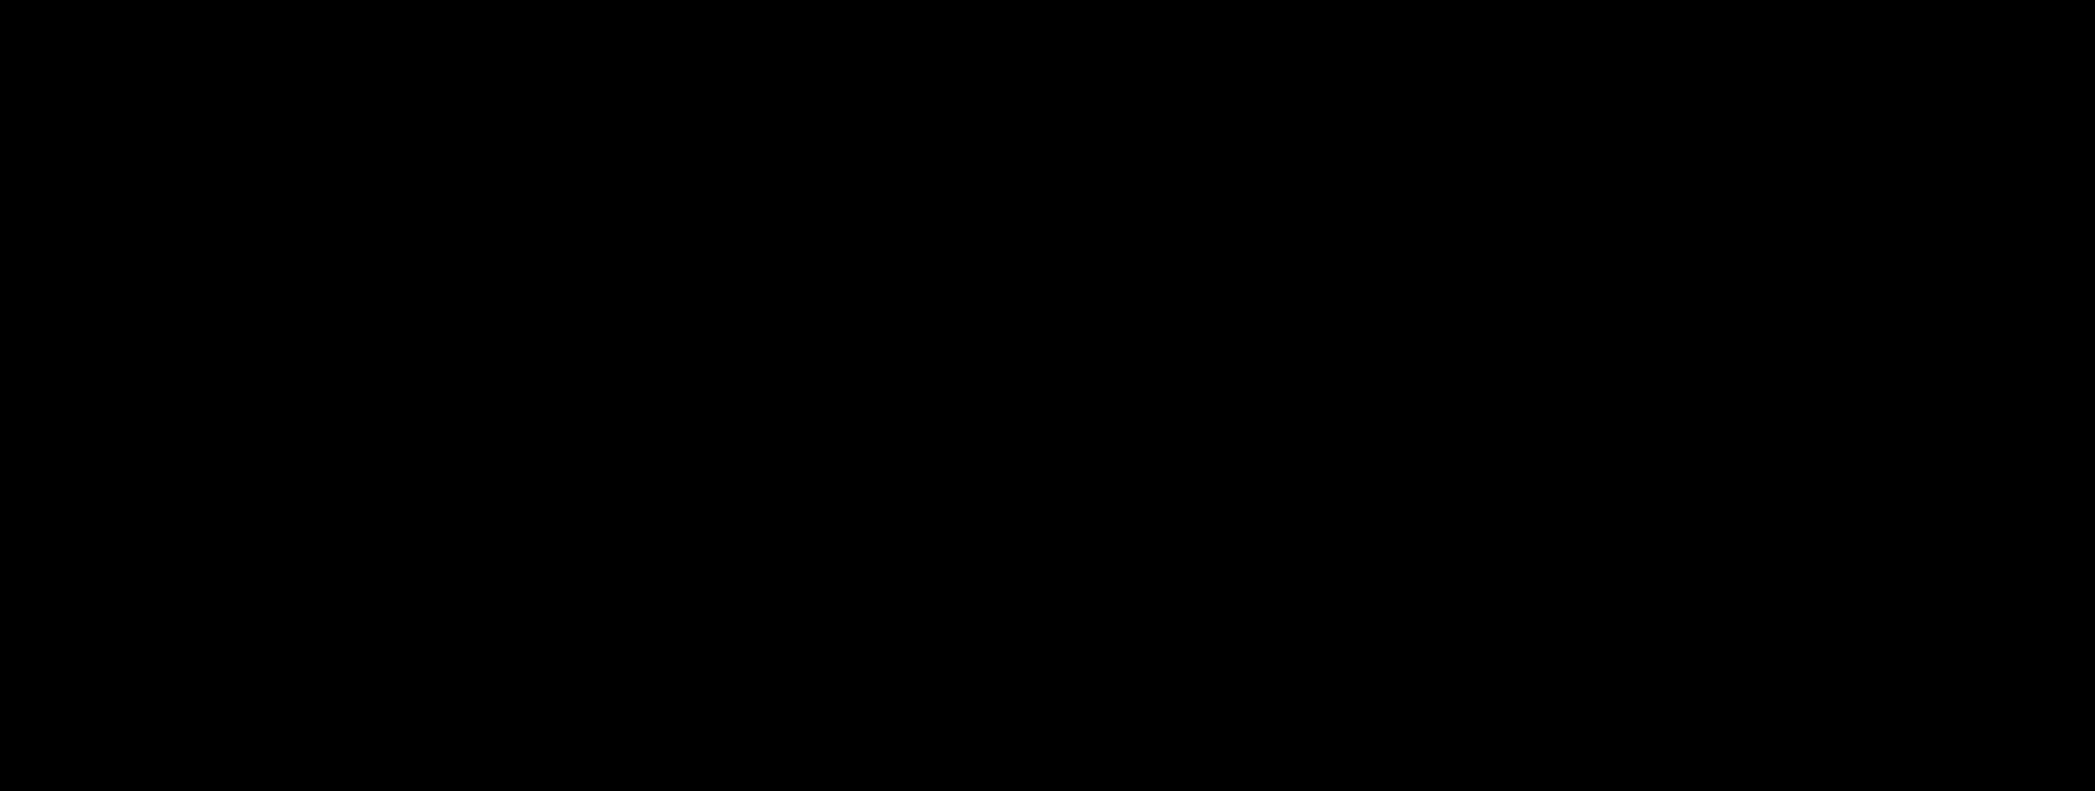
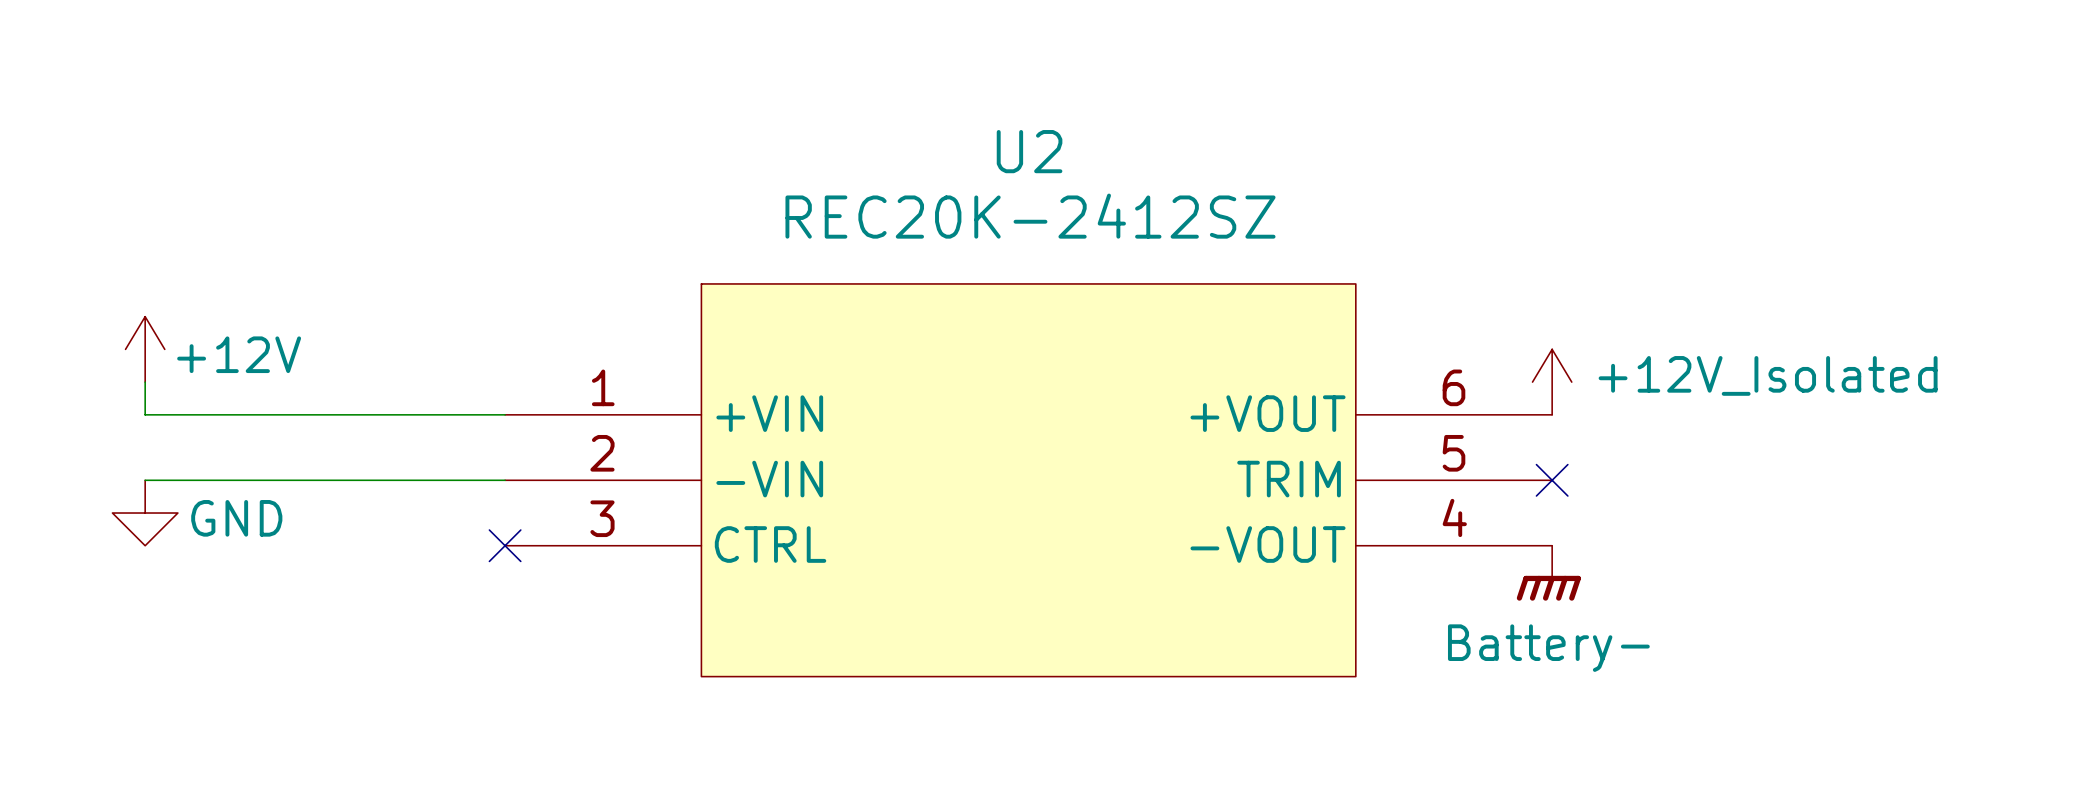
power symbol: none -> +12V (145, 349)
wire: none -> (145, 382) (145, 414) (505, 414)
power symbol: none -> +12V_Isolated (1552, 382)
wire: none -> (145, 480) (505, 480)
U2: none -> REC20K-2412SZ (1028, 480)
no-connect mark: none -> (1552, 480)
power symbol: none -> GND (145, 513)
no-connect mark: none -> (505, 545)
power symbol: none -> Battery- (1548, 573)

